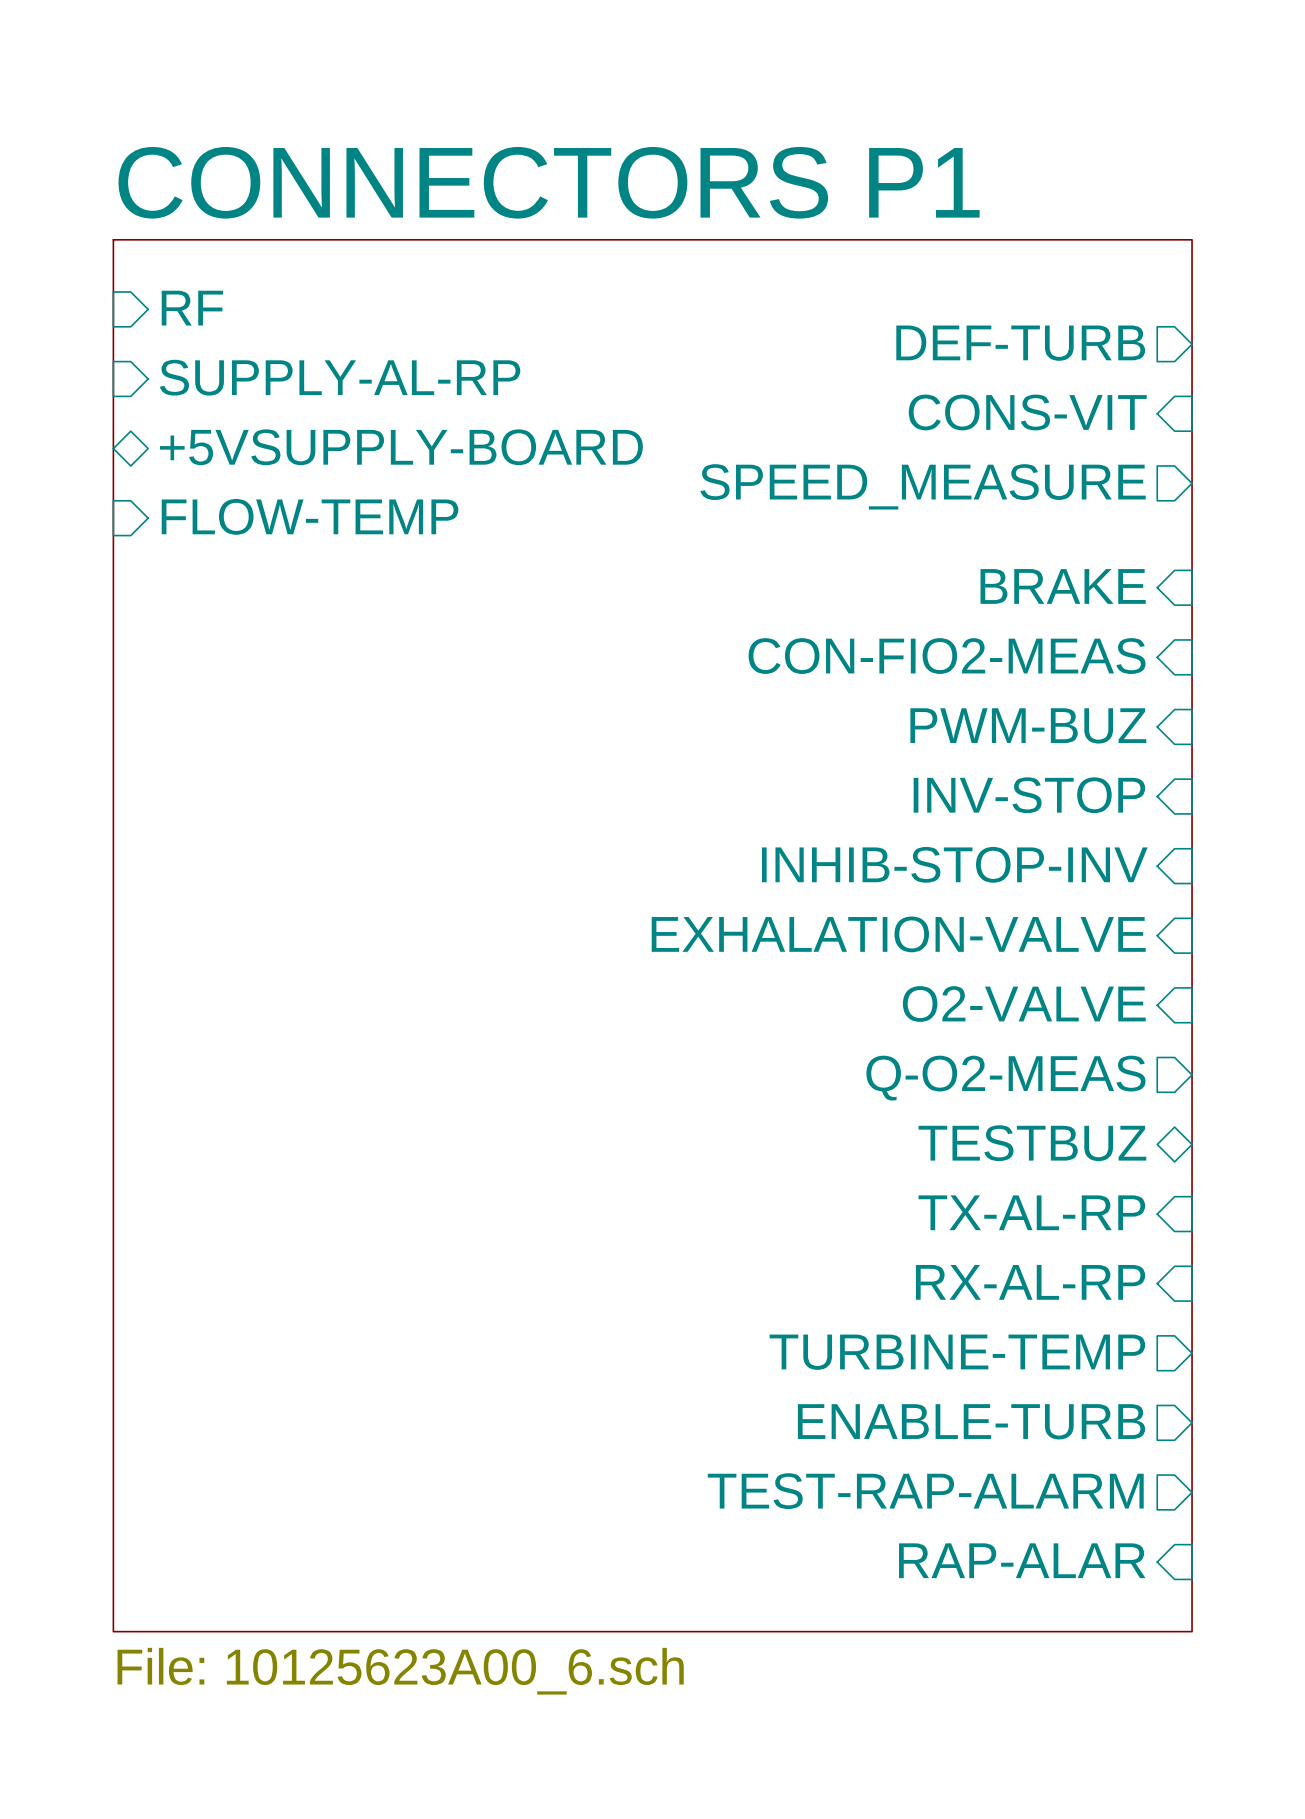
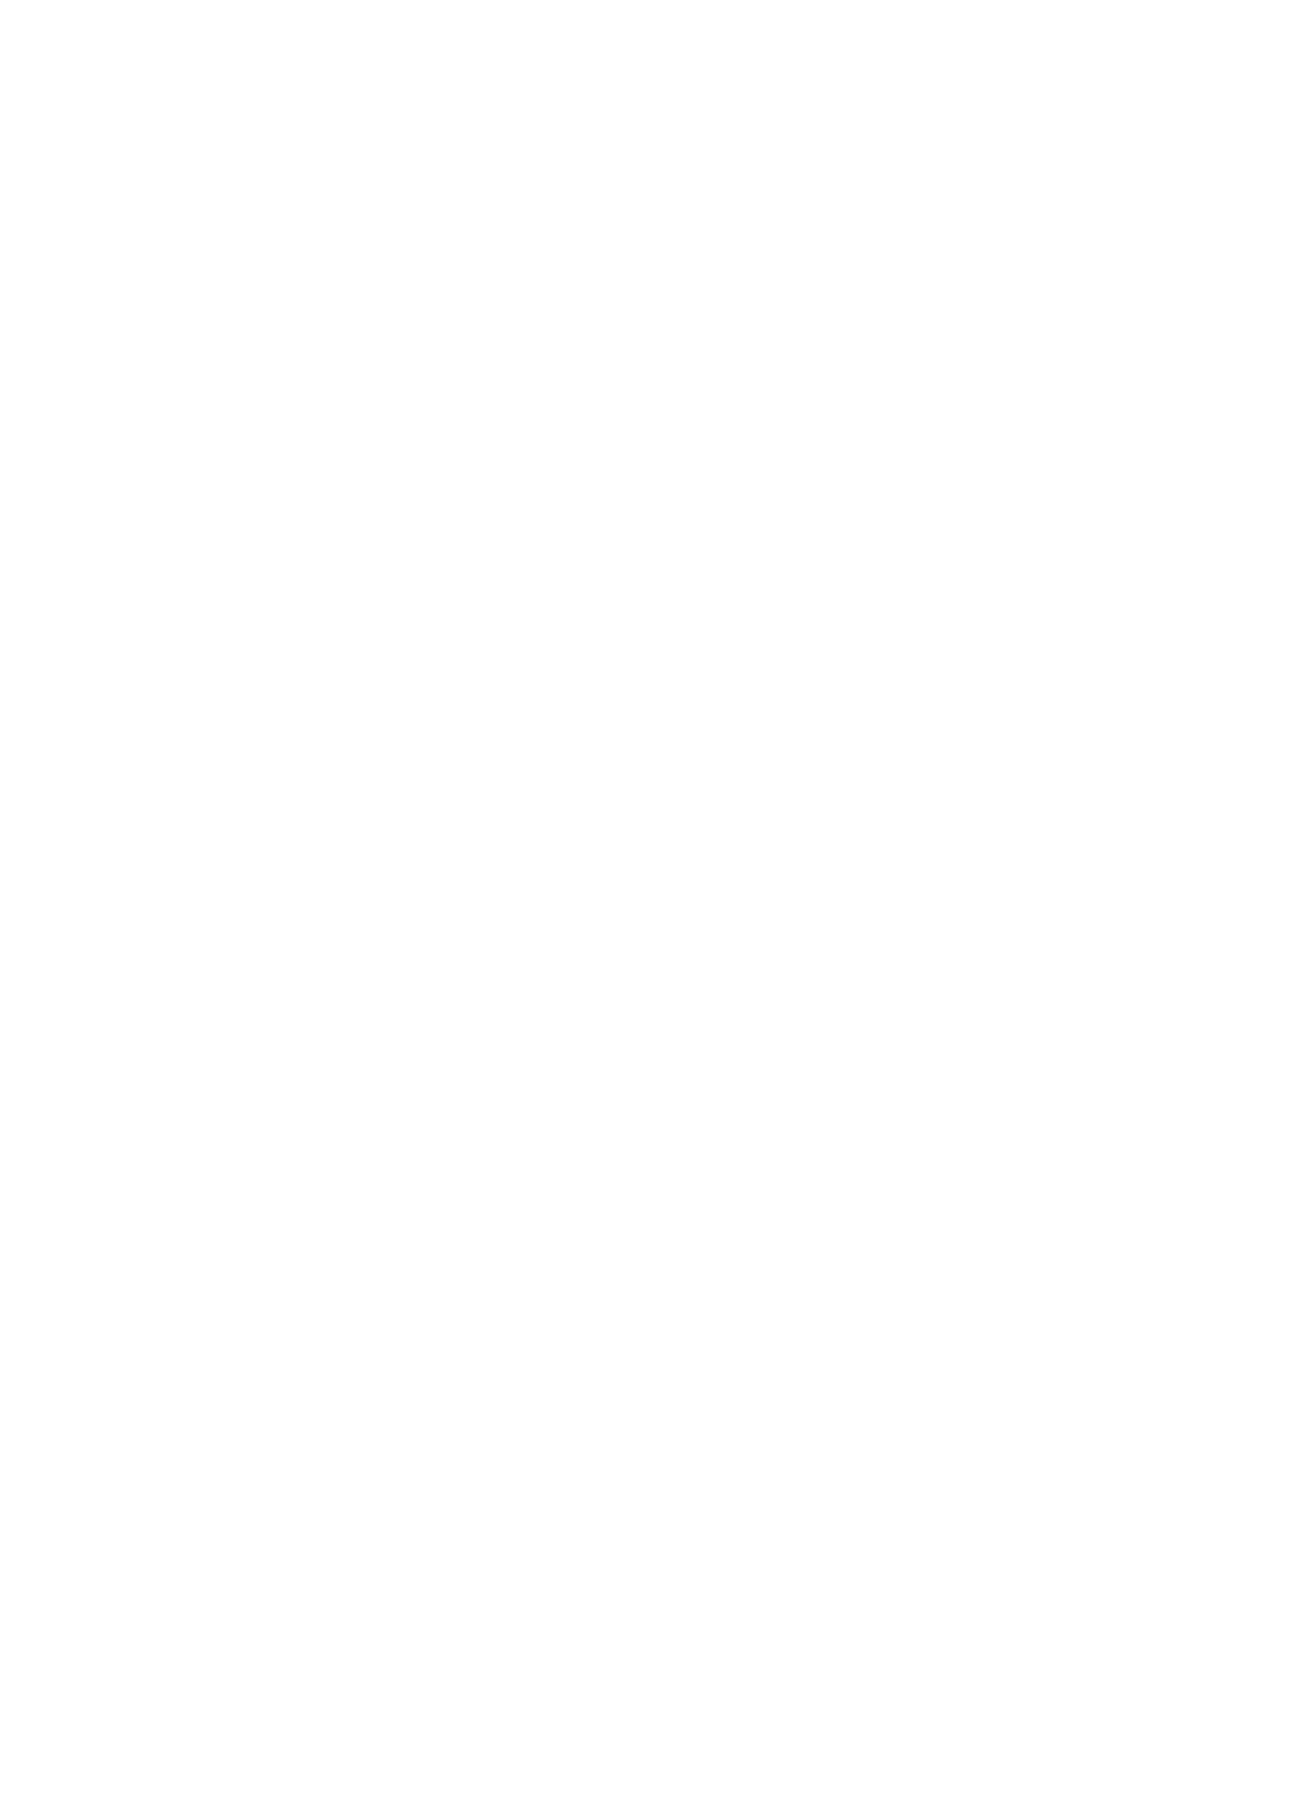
sheet pin: RF (192, 308) -> none
sheet pin: DEF-TURB (1020, 343) -> none
sheet pin: SUPPLY-AL-RP (340, 377) -> none
sheet pin: CONS-VIT (1027, 412) -> none
sheet pin: +5VSUPPLY-BOARD (401, 447) -> none
sheet pin: SPEED_MEASURE (923, 486) -> none
sheet pin: FLOW-TEMP (310, 516) -> none
sheet pin: BRAKE (1063, 586) -> none
sheet pin: CON-FIO2-MEAS (947, 656) -> none
sheet pin: PWM-BUZ (1028, 725) -> none
sheet pin: INV-STOP (1029, 795) -> none
sheet pin: INHIB-STOP-INV (954, 864) -> none
sheet pin: EXHALATION-VALVE (898, 934) -> none
sheet CONNECTORS P1: File: 10125623A00_6.sch (652, 935) -> none
sheet pin: O2-VALVE (1024, 1004) -> none
sheet pin: Q-O2-MEAS (1005, 1078) -> none
sheet pin: TESTBUZ (1032, 1143) -> none
sheet pin: TX-AL-RP (1031, 1212) -> none
sheet pin: RX-AL-RP (1030, 1282) -> none
sheet pin: TURBINE-TEMP (957, 1352) -> none
sheet pin: ENABLE-TURB (971, 1421) -> none
sheet pin: TEST-RAP-ALARM (925, 1491) -> none
sheet pin: RAP-ALAR (1022, 1560) -> none

